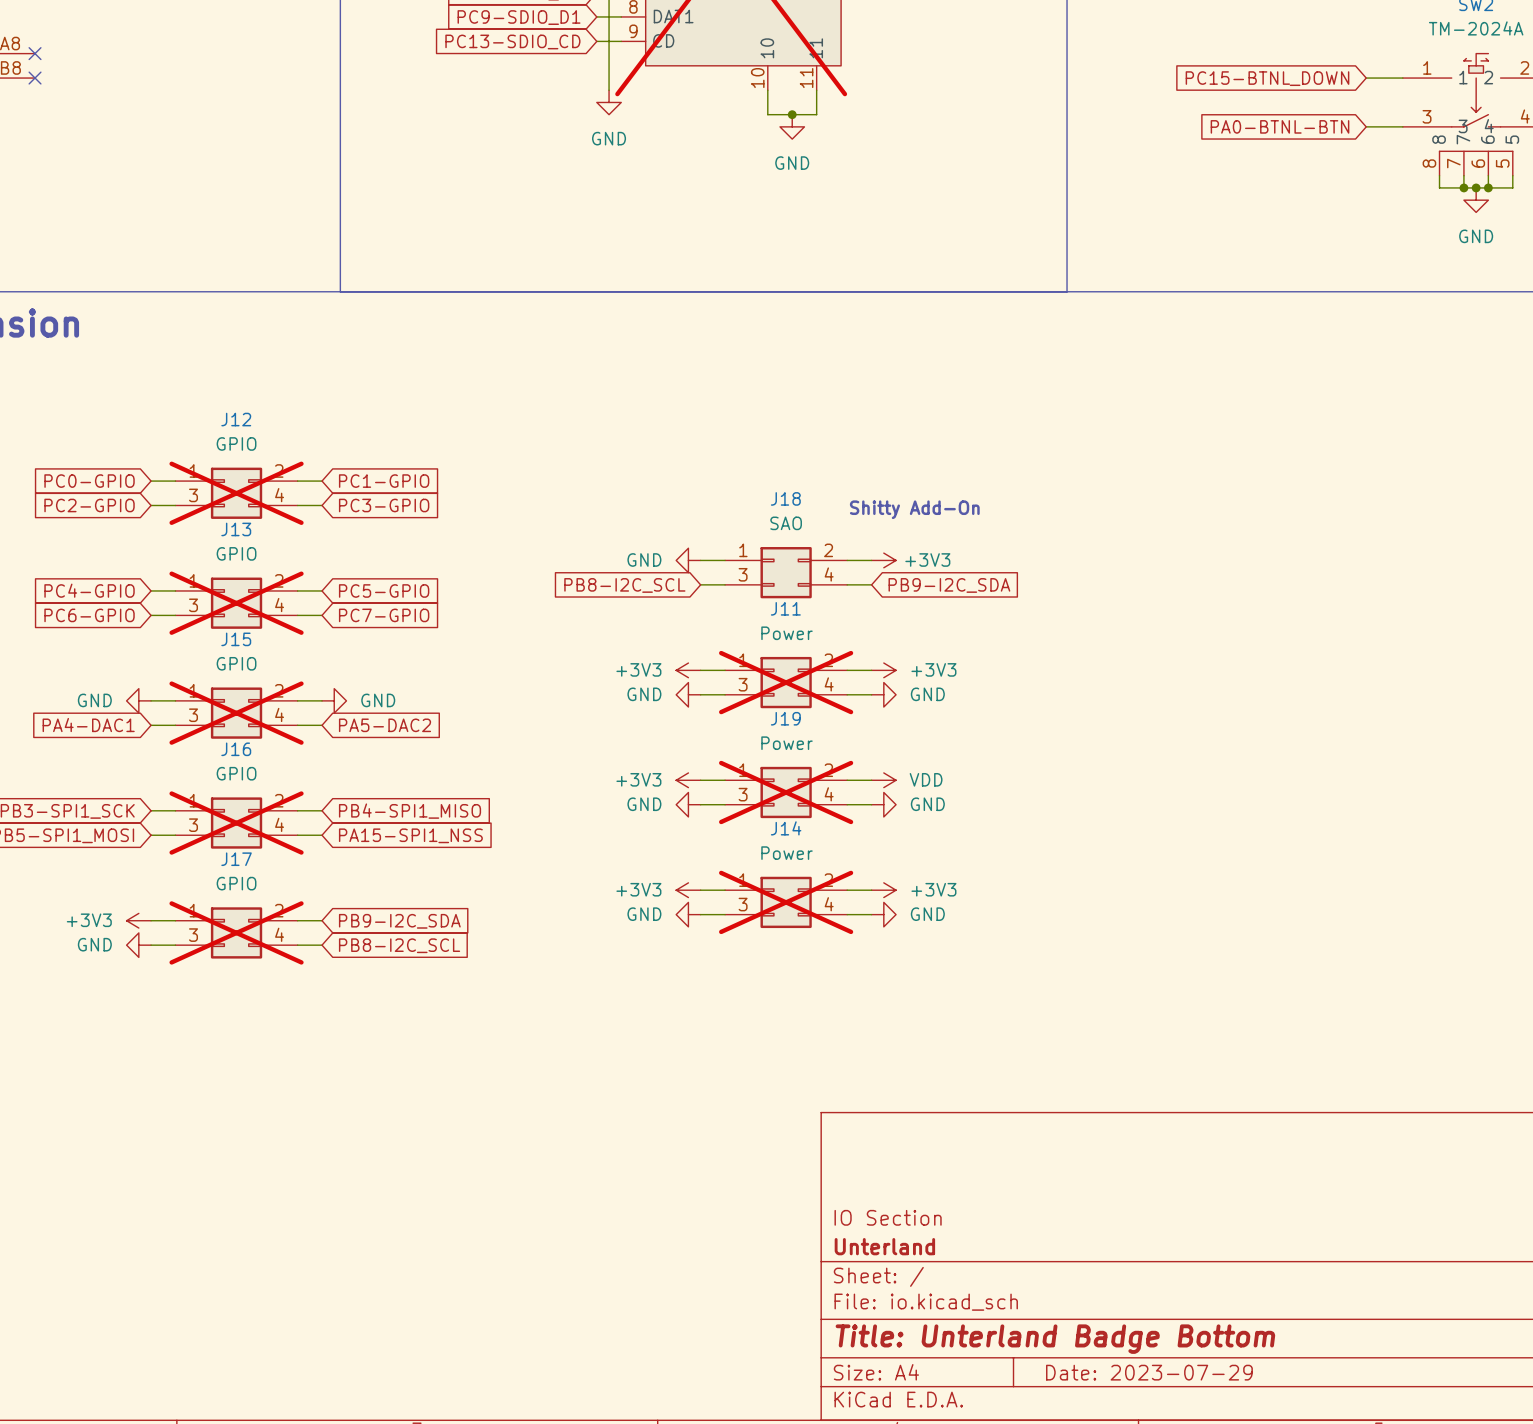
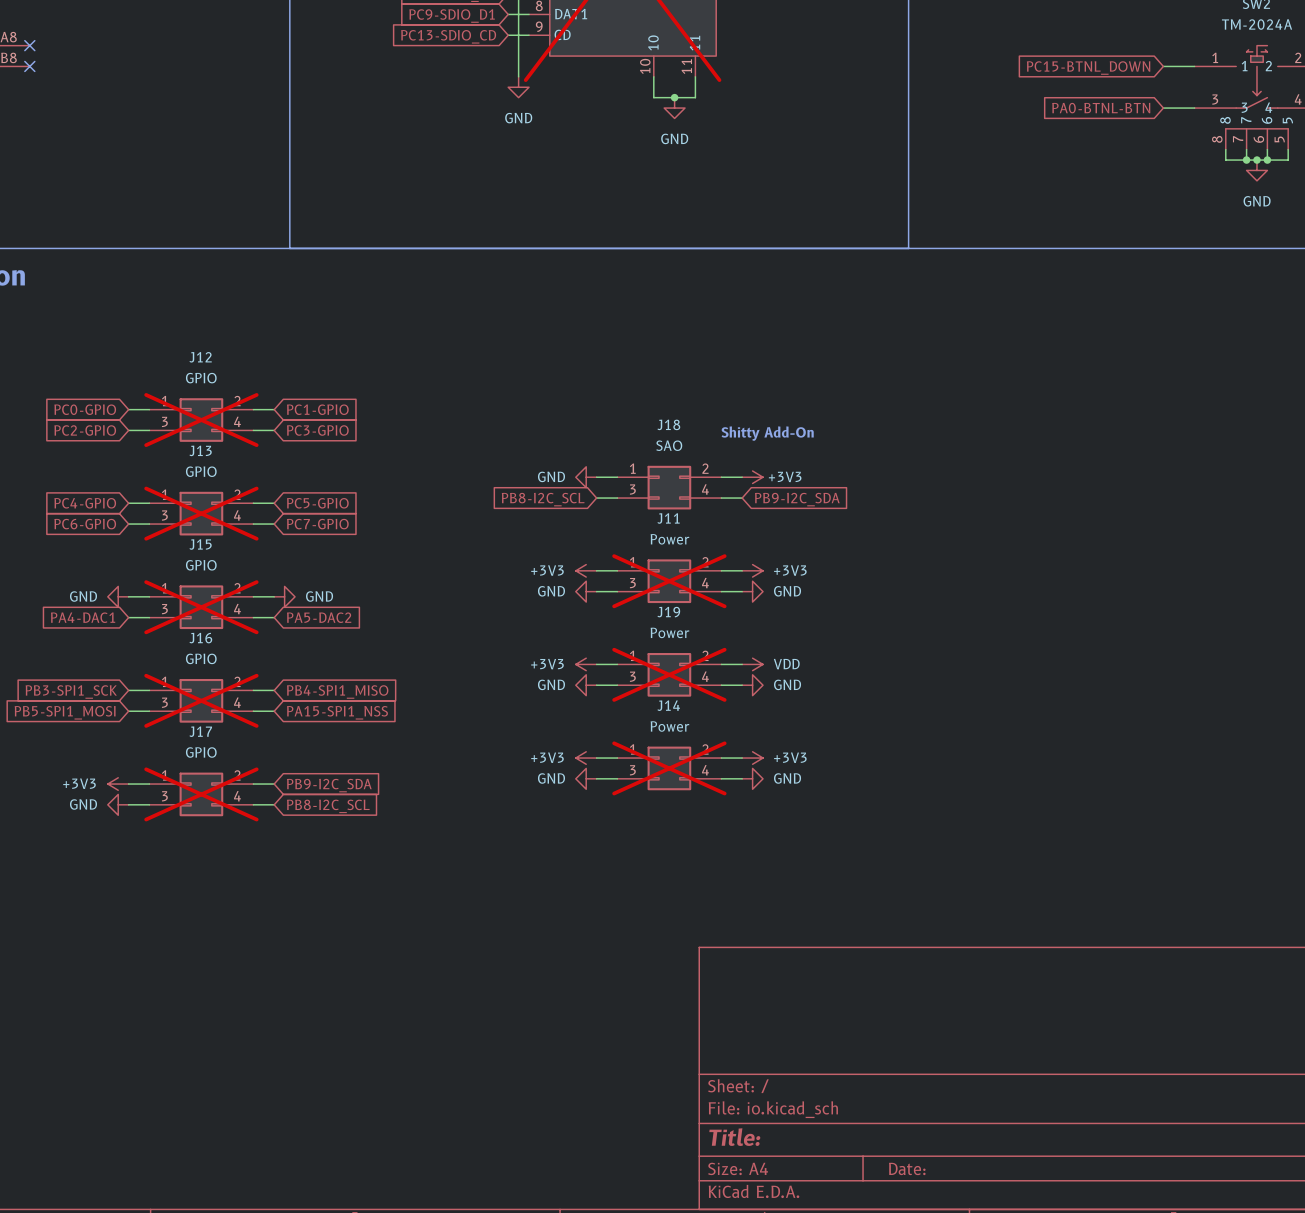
title block: IO Section (888, 1217) -> none
title block: Unterland (884, 1246) -> none
title block: Title: Unterland Badge Bottom (1055, 1339) -> Title: (734, 1137)
title block: Date: 2023-07-29 (1149, 1372) -> Date: (907, 1168)

